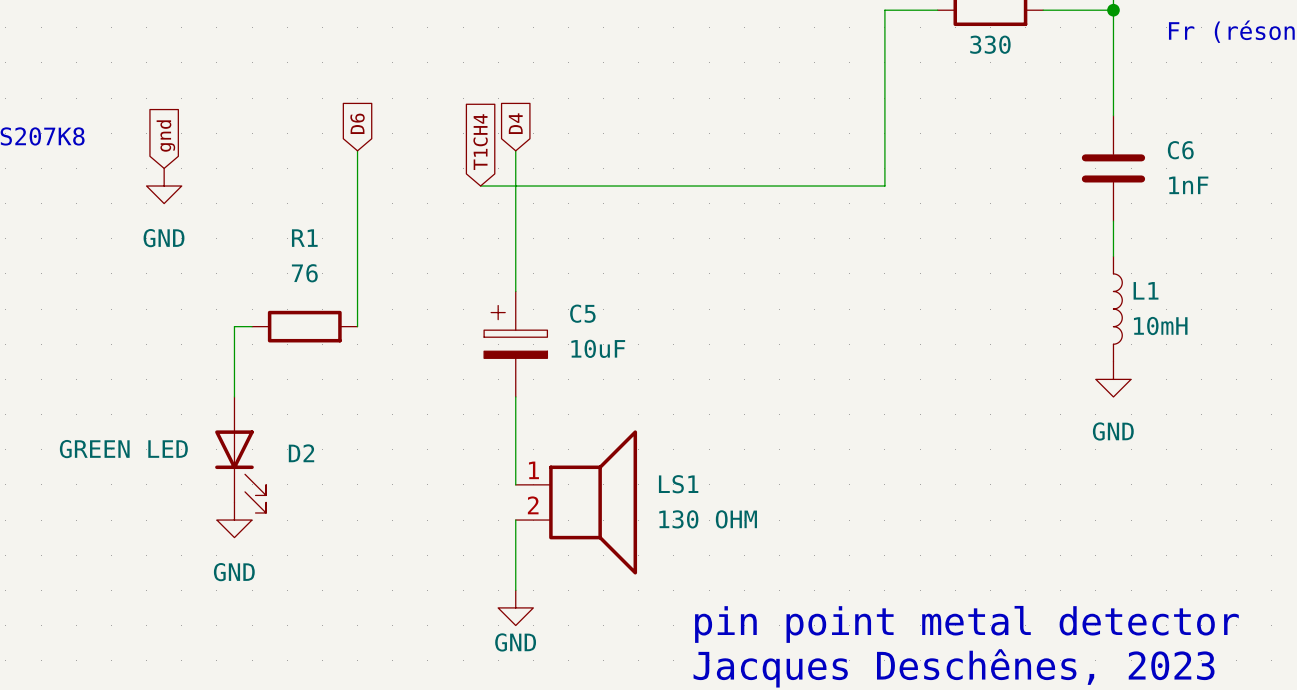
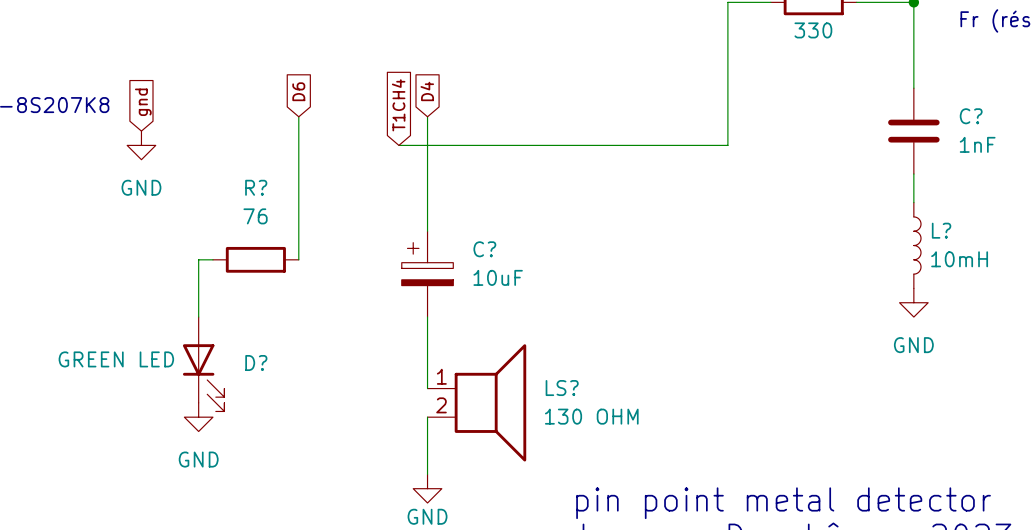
C6 name: C6 (1180, 150) -> C? (971, 116)
R1 name: R1 (304, 238) -> R? (256, 187)
L1 name: L1 (1146, 290) -> L? (941, 230)
C5 name: C5 (582, 313) -> C? (484, 249)
D2 name: D2 (301, 453) -> D? (256, 363)
LS1 name: LS1 (678, 484) -> LS? (562, 388)

